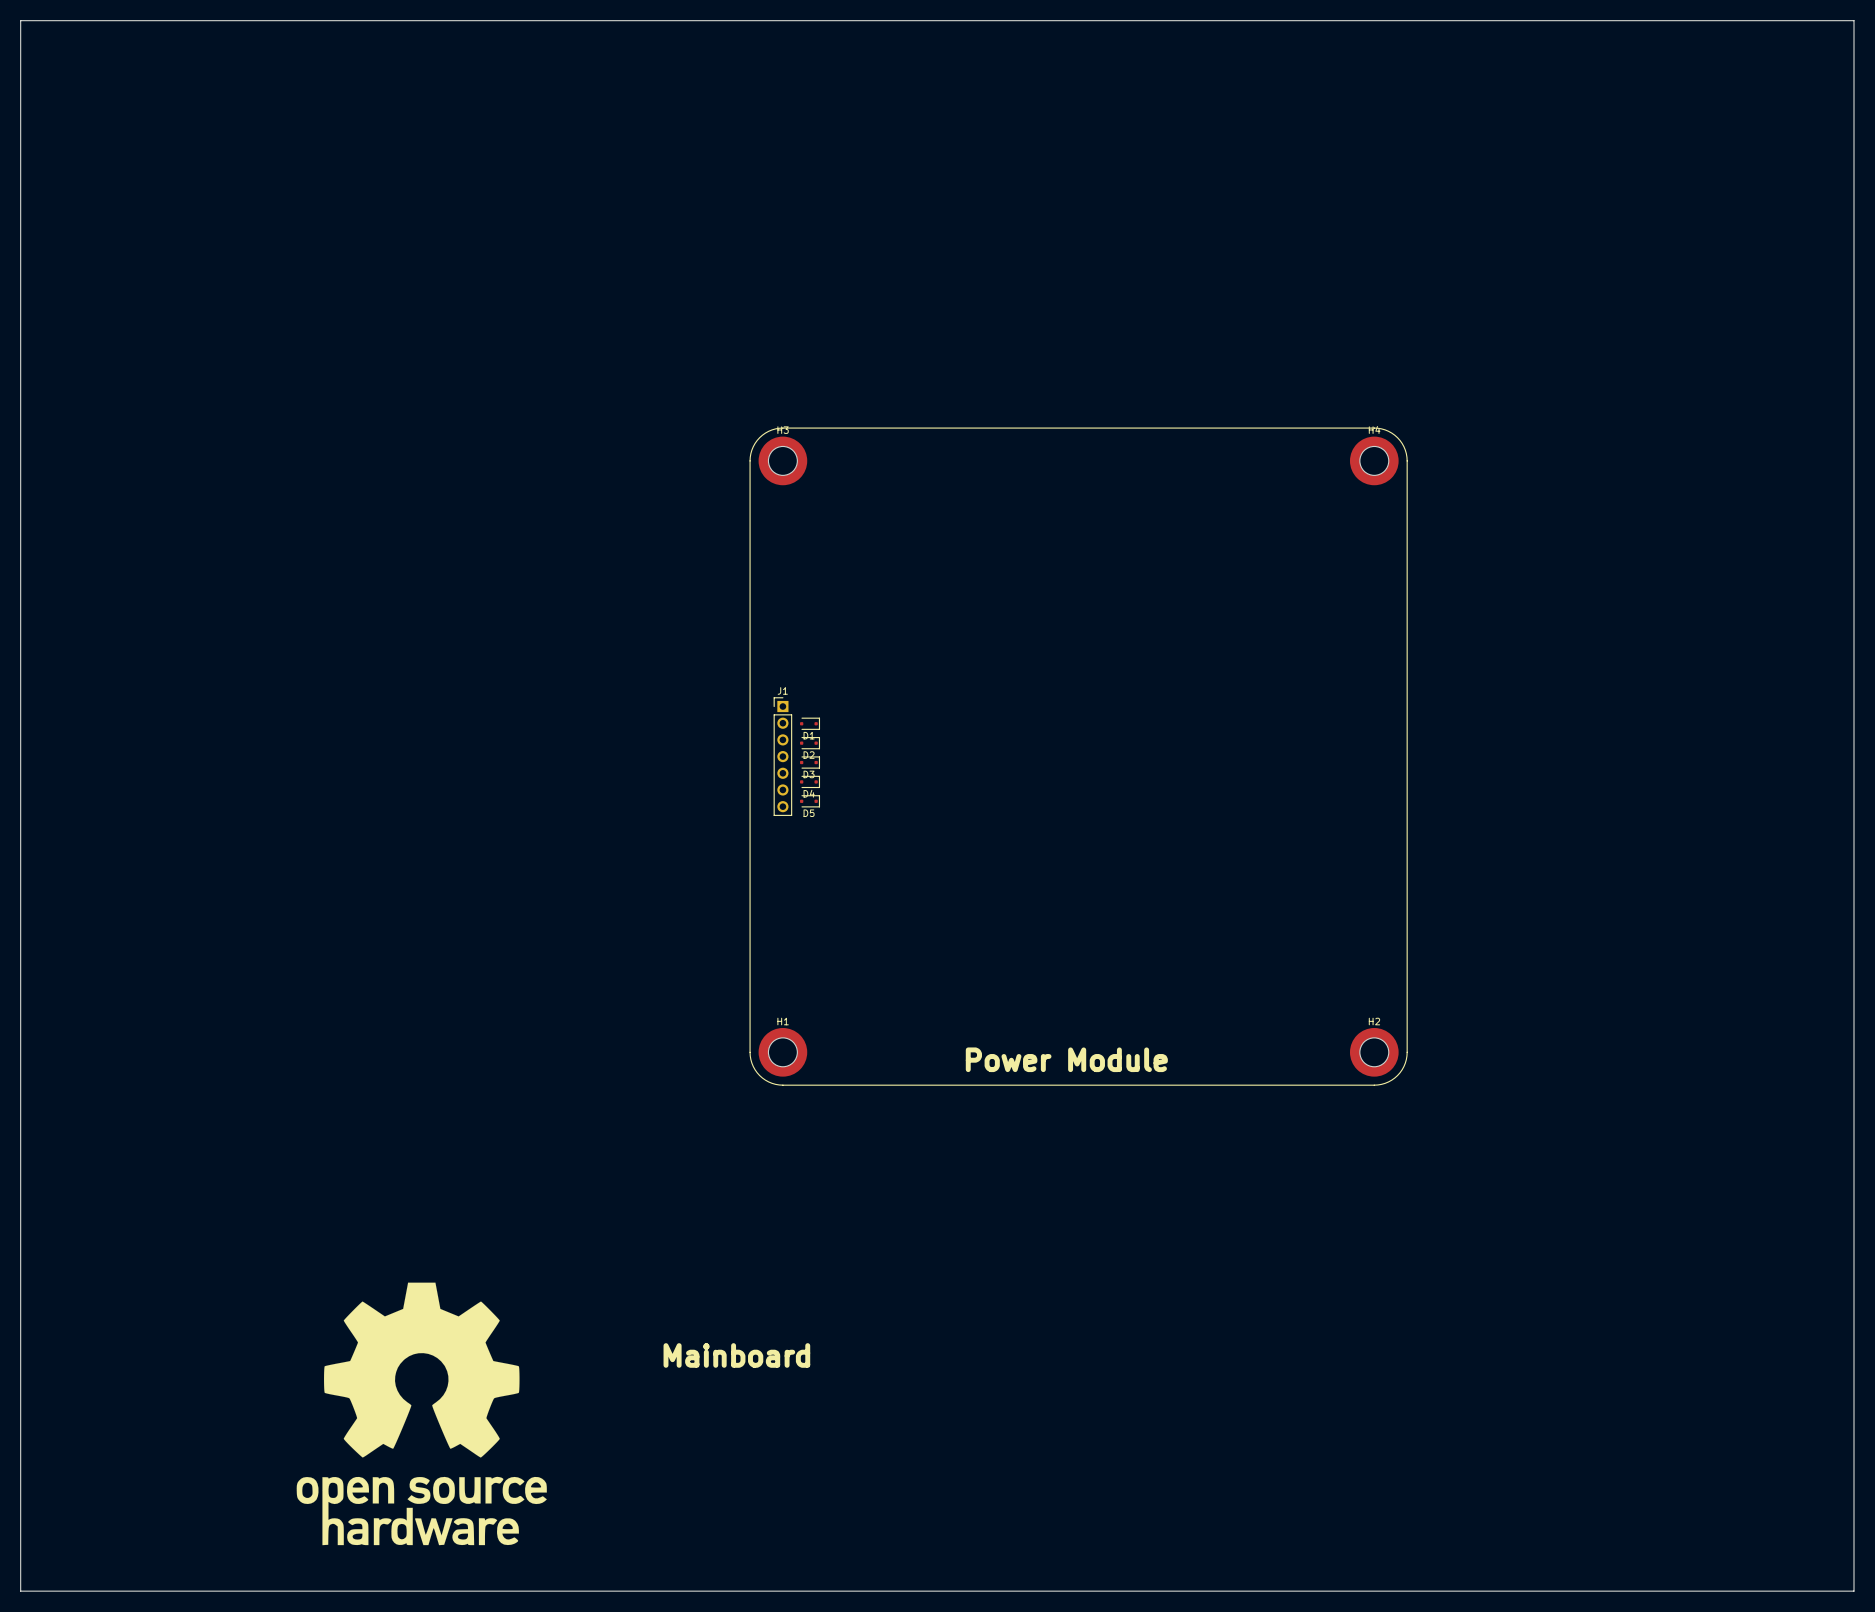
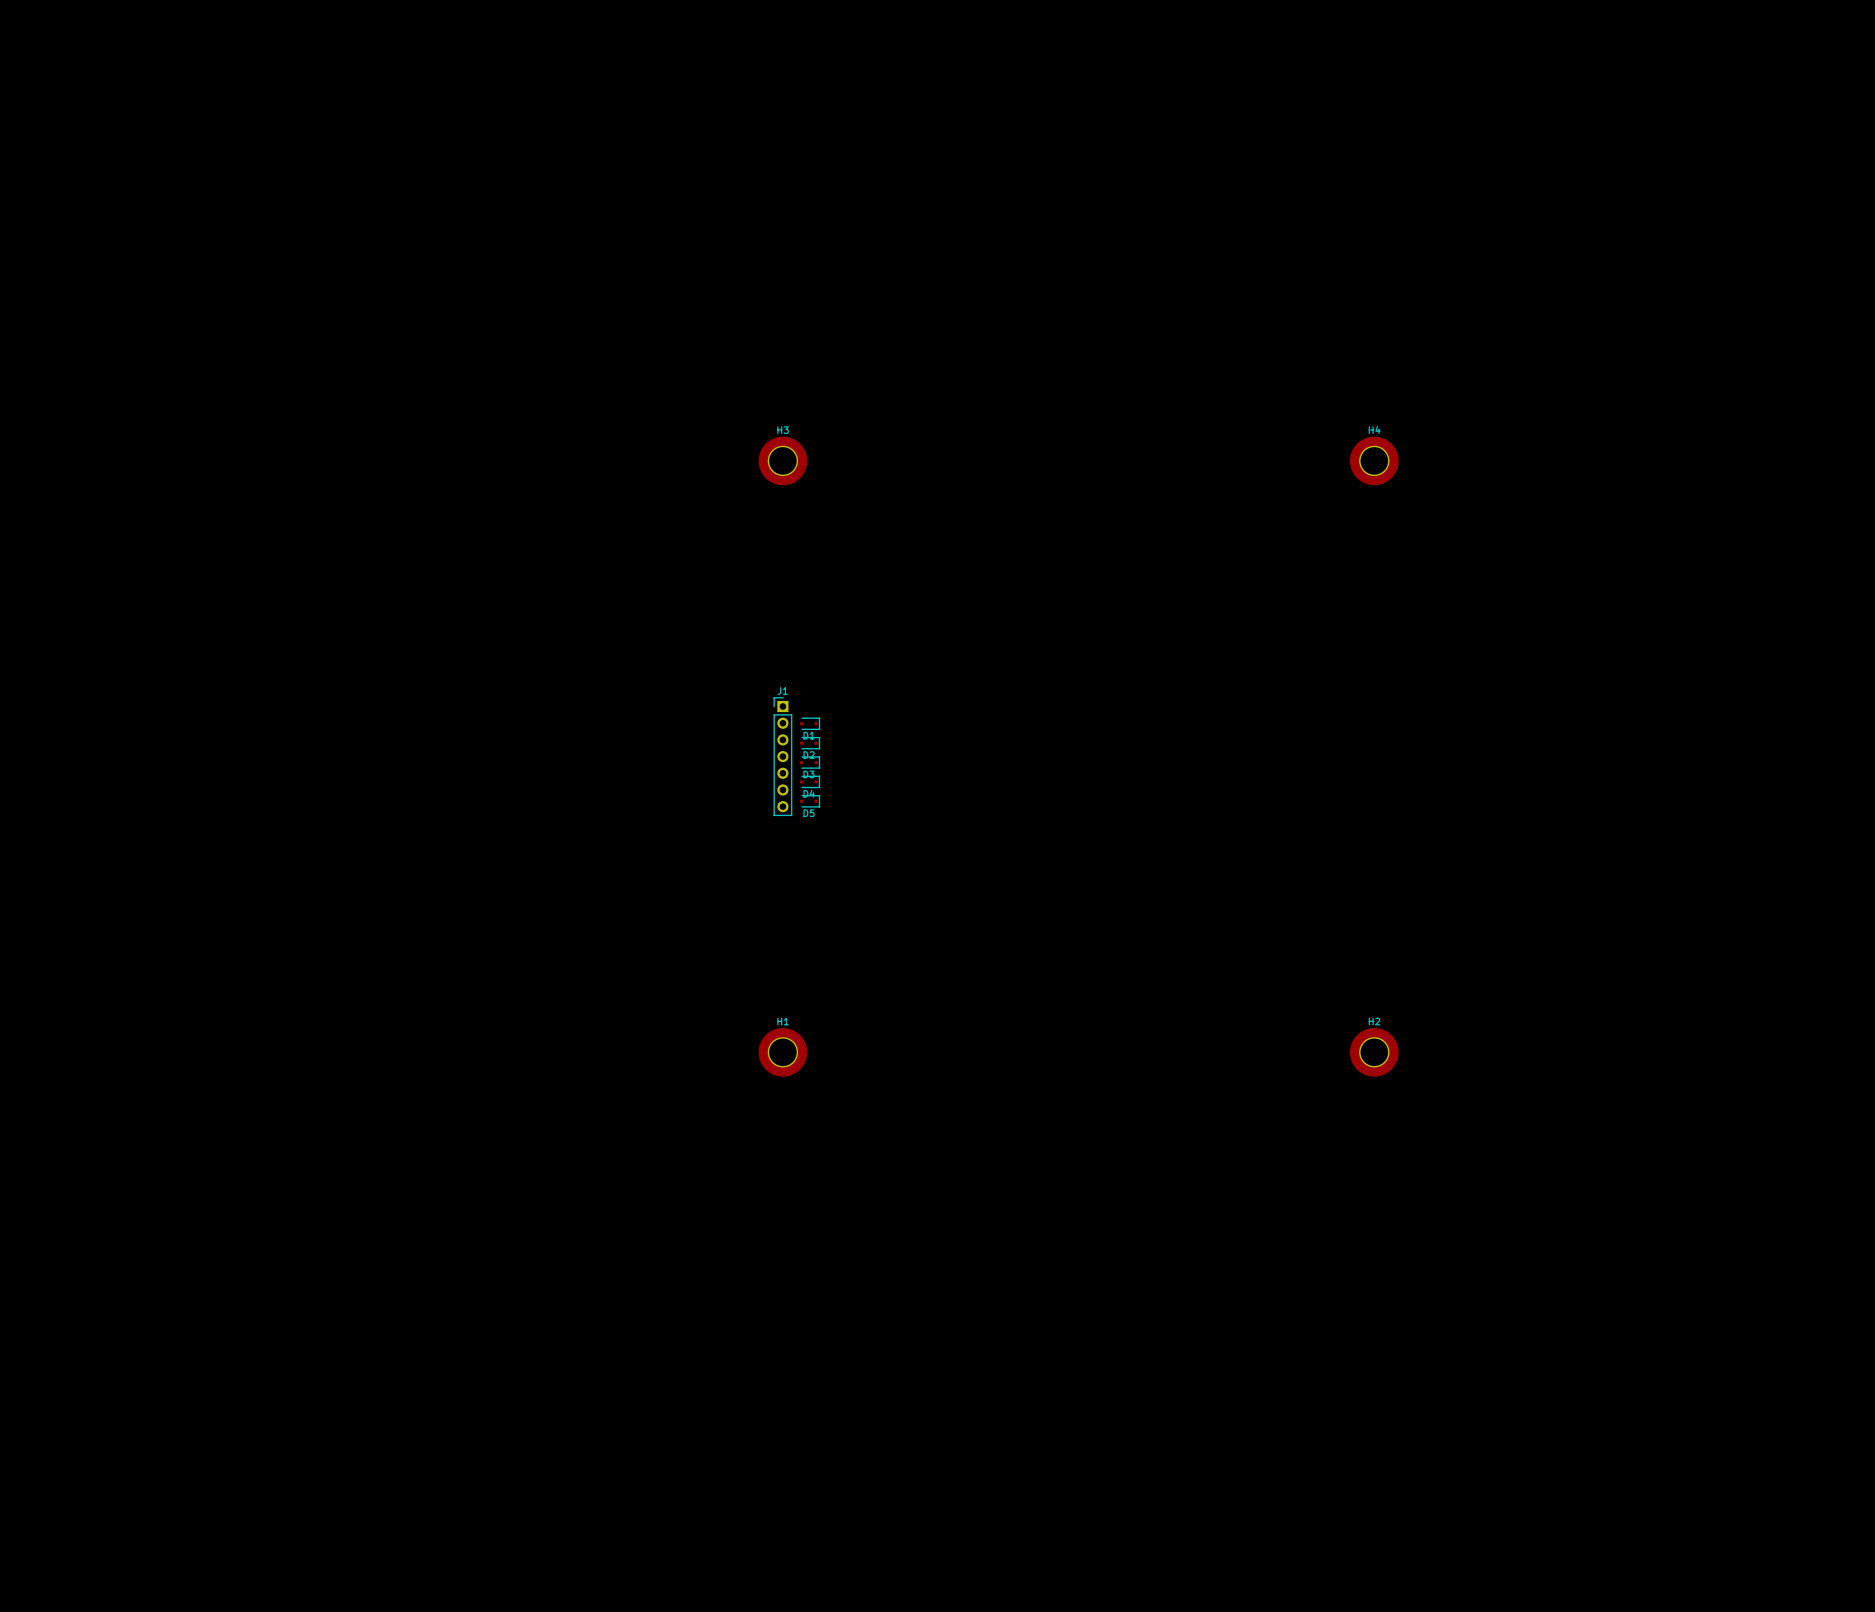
board edge: (20, 20) (1854, 20) (1854, 1591) (20, 1591) (20, 20) -> none
line: (782, 428) (1374, 428) (1388, 431) (1397, 437) (1405, 450) (1407, 460) (1407, 1052) (1405, 1063) (1397, 1075) (1388, 1081) (1374, 1085) (782, 1085) (768, 1081) (759, 1075) (753, 1066) (750, 1052) (750, 460) (753, 446) (759, 437) (772, 429) (782, 428) -> none
text: Power Module (1066, 1059) -> none
drawing: [296, 1282, 547, 1546] -> none
text: Mainboard (736, 1355) -> none

